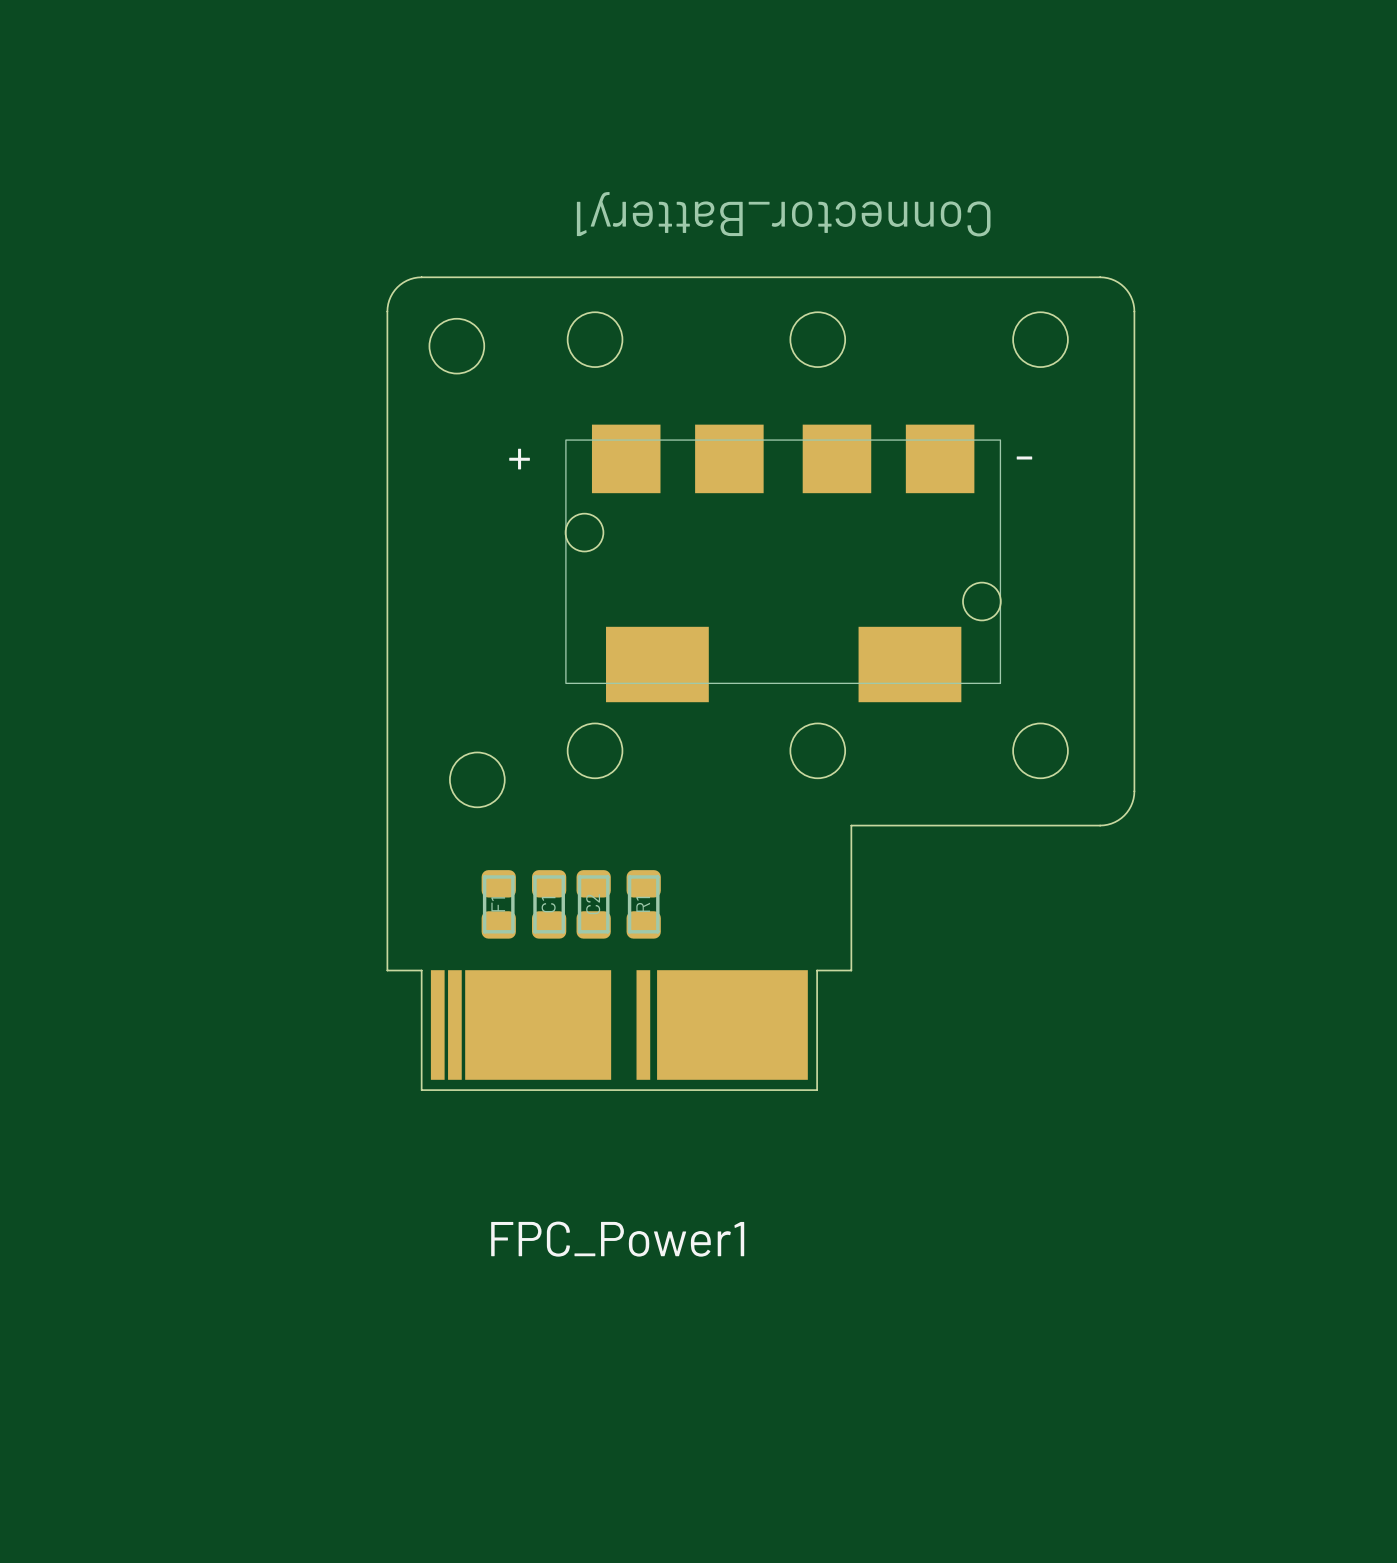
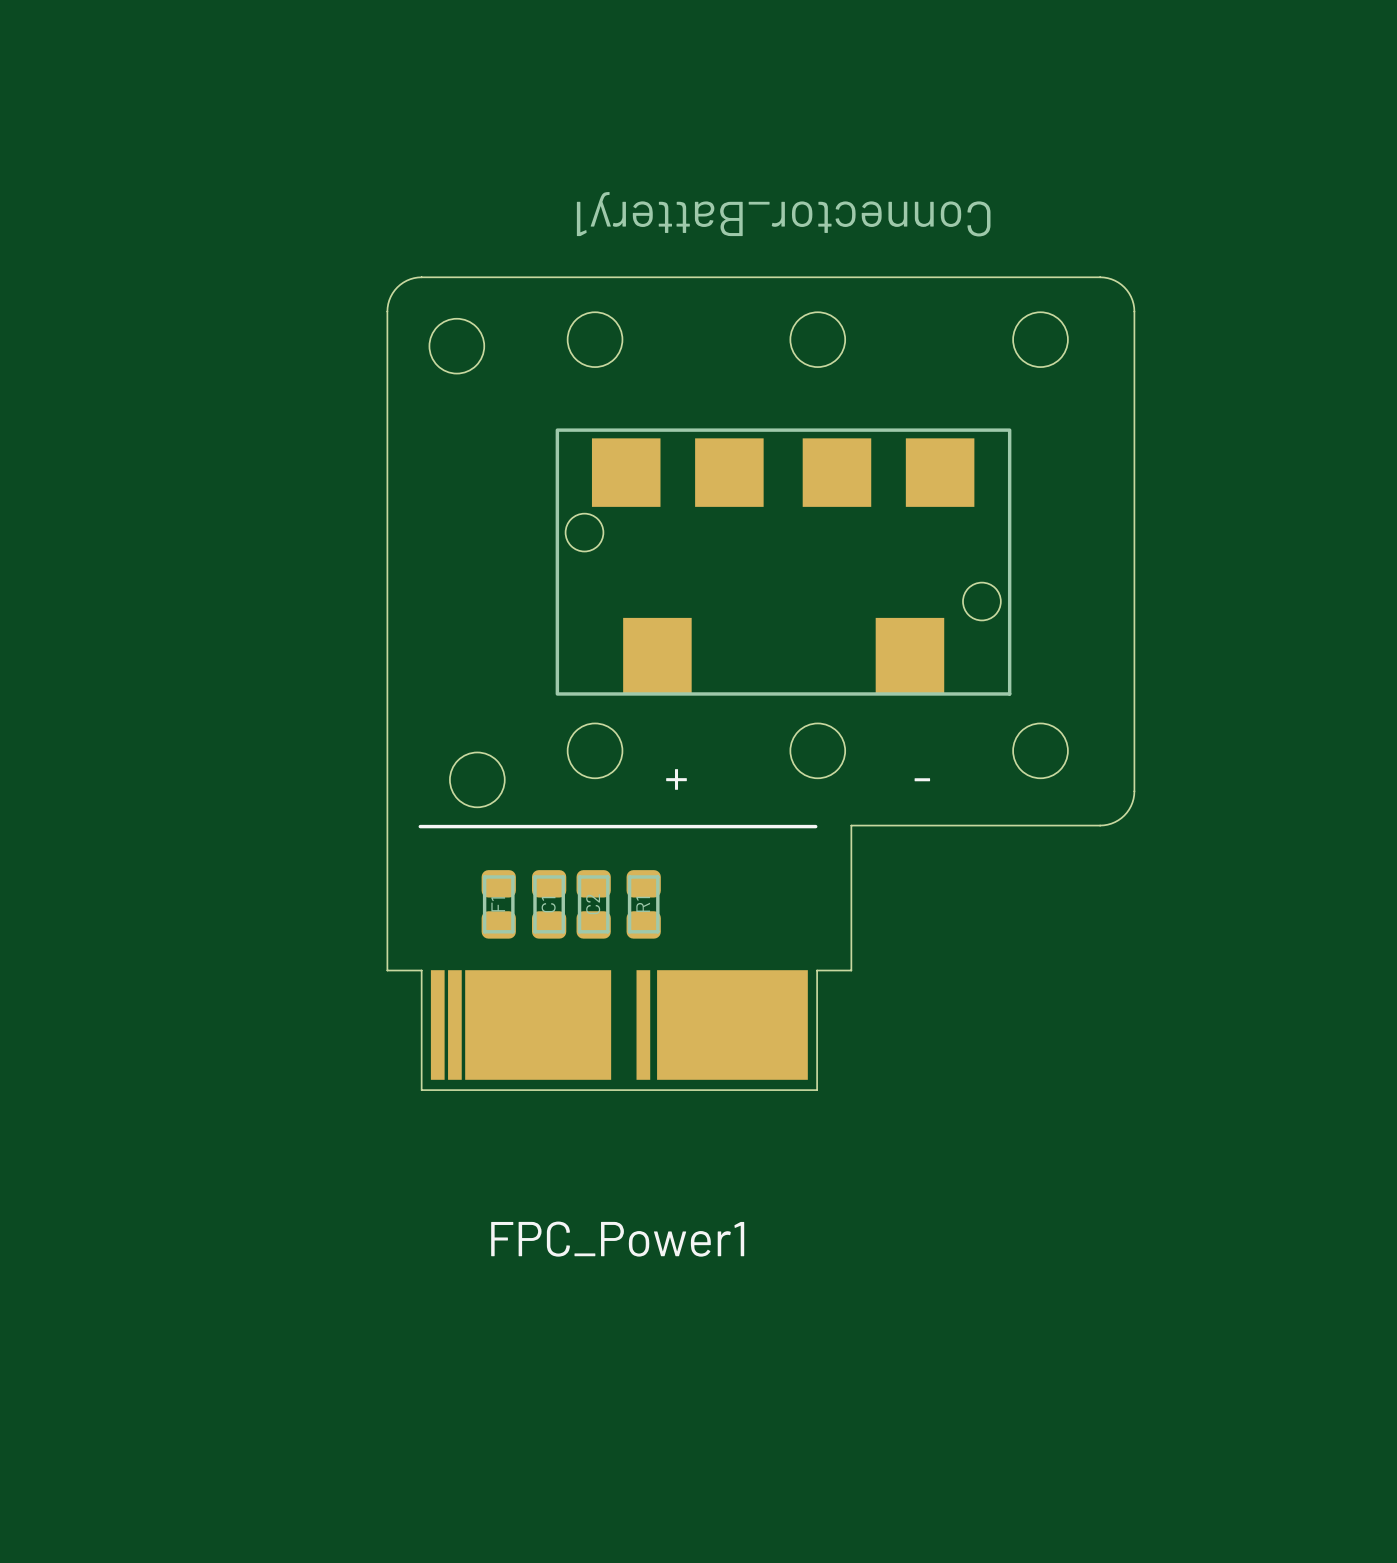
Connector_Battery1 footprint: [564, 424, 1002, 703] -> [555, 428, 1012, 696]
text position: - (1024, 457) -> - (922, 779)
text position: + (519, 459) -> + (676, 779)
line: none -> (420, 826) (815, 826)

